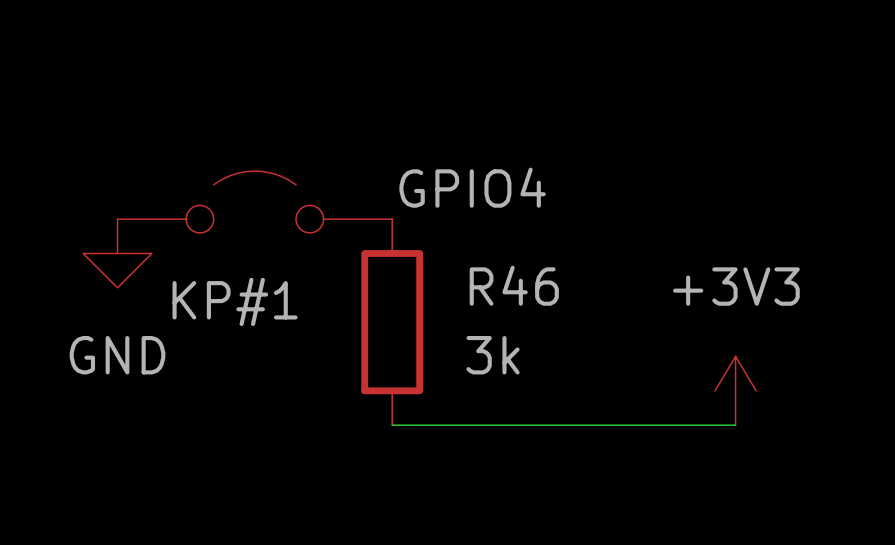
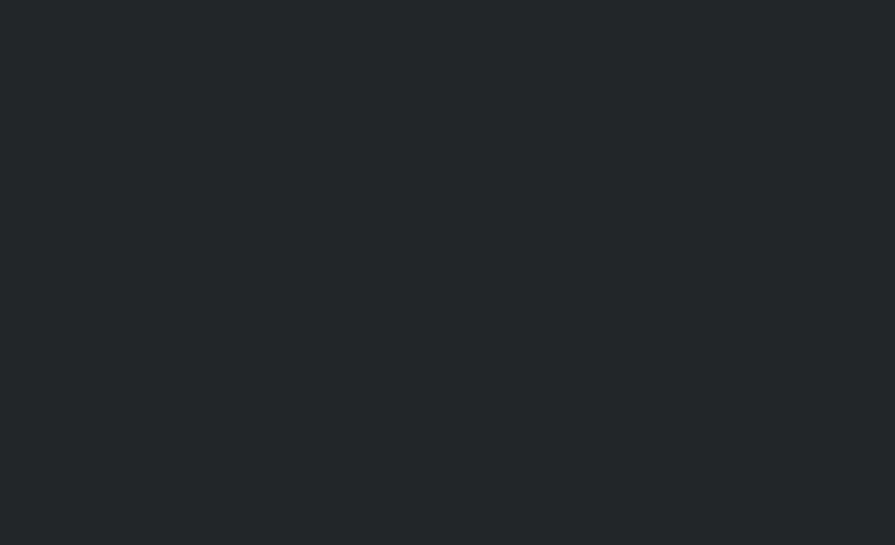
label: GPIO4 (472, 187) -> none
KP#1: (254, 201) -> none
power symbol: GND (117, 253) -> none
R46: 3k (392, 322) -> none
power symbol: +3V3 (735, 390) -> none
wire: (392, 425) (735, 425) -> none

